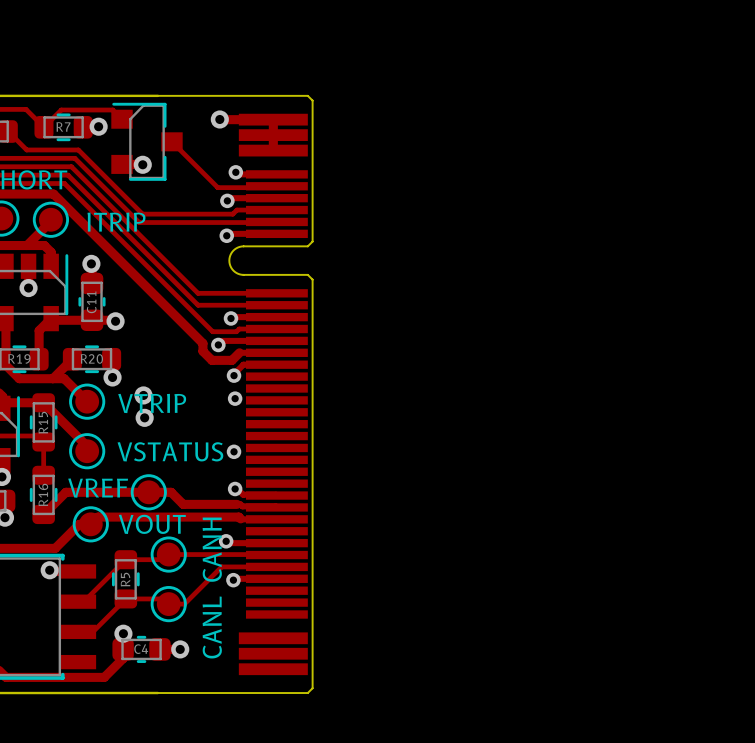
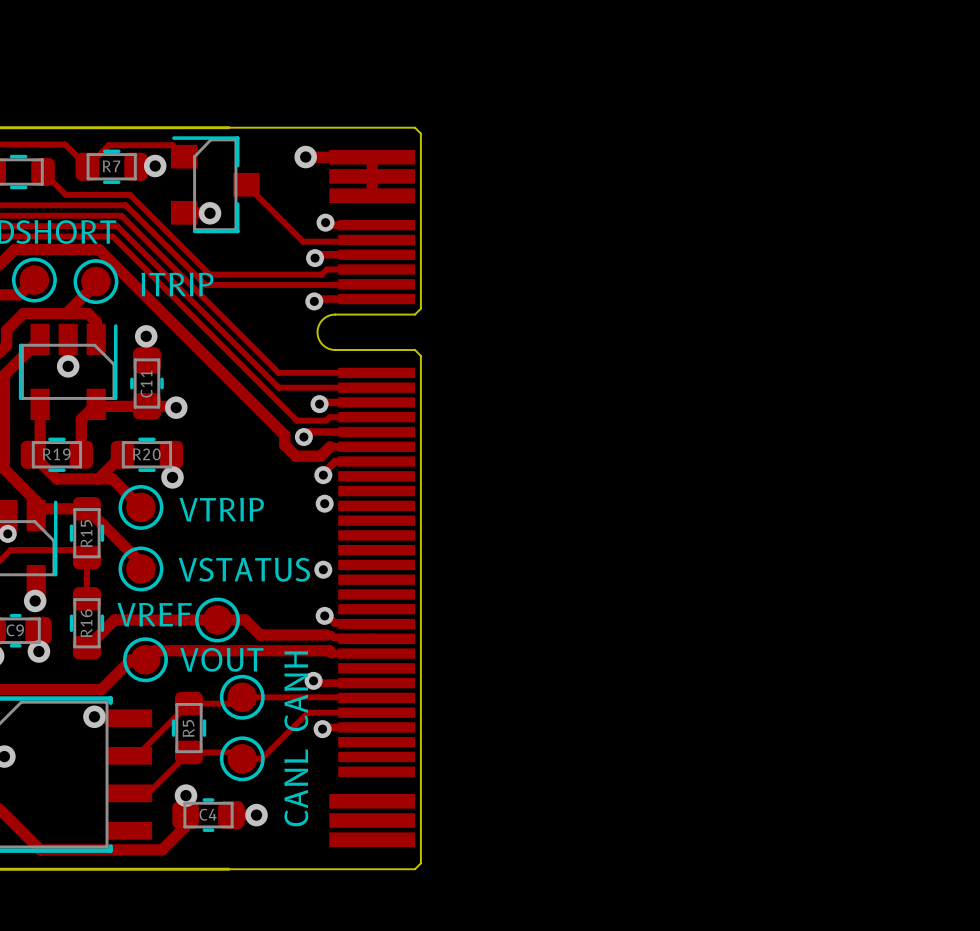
via: (143, 395) -> none
via: (144, 417) -> none

